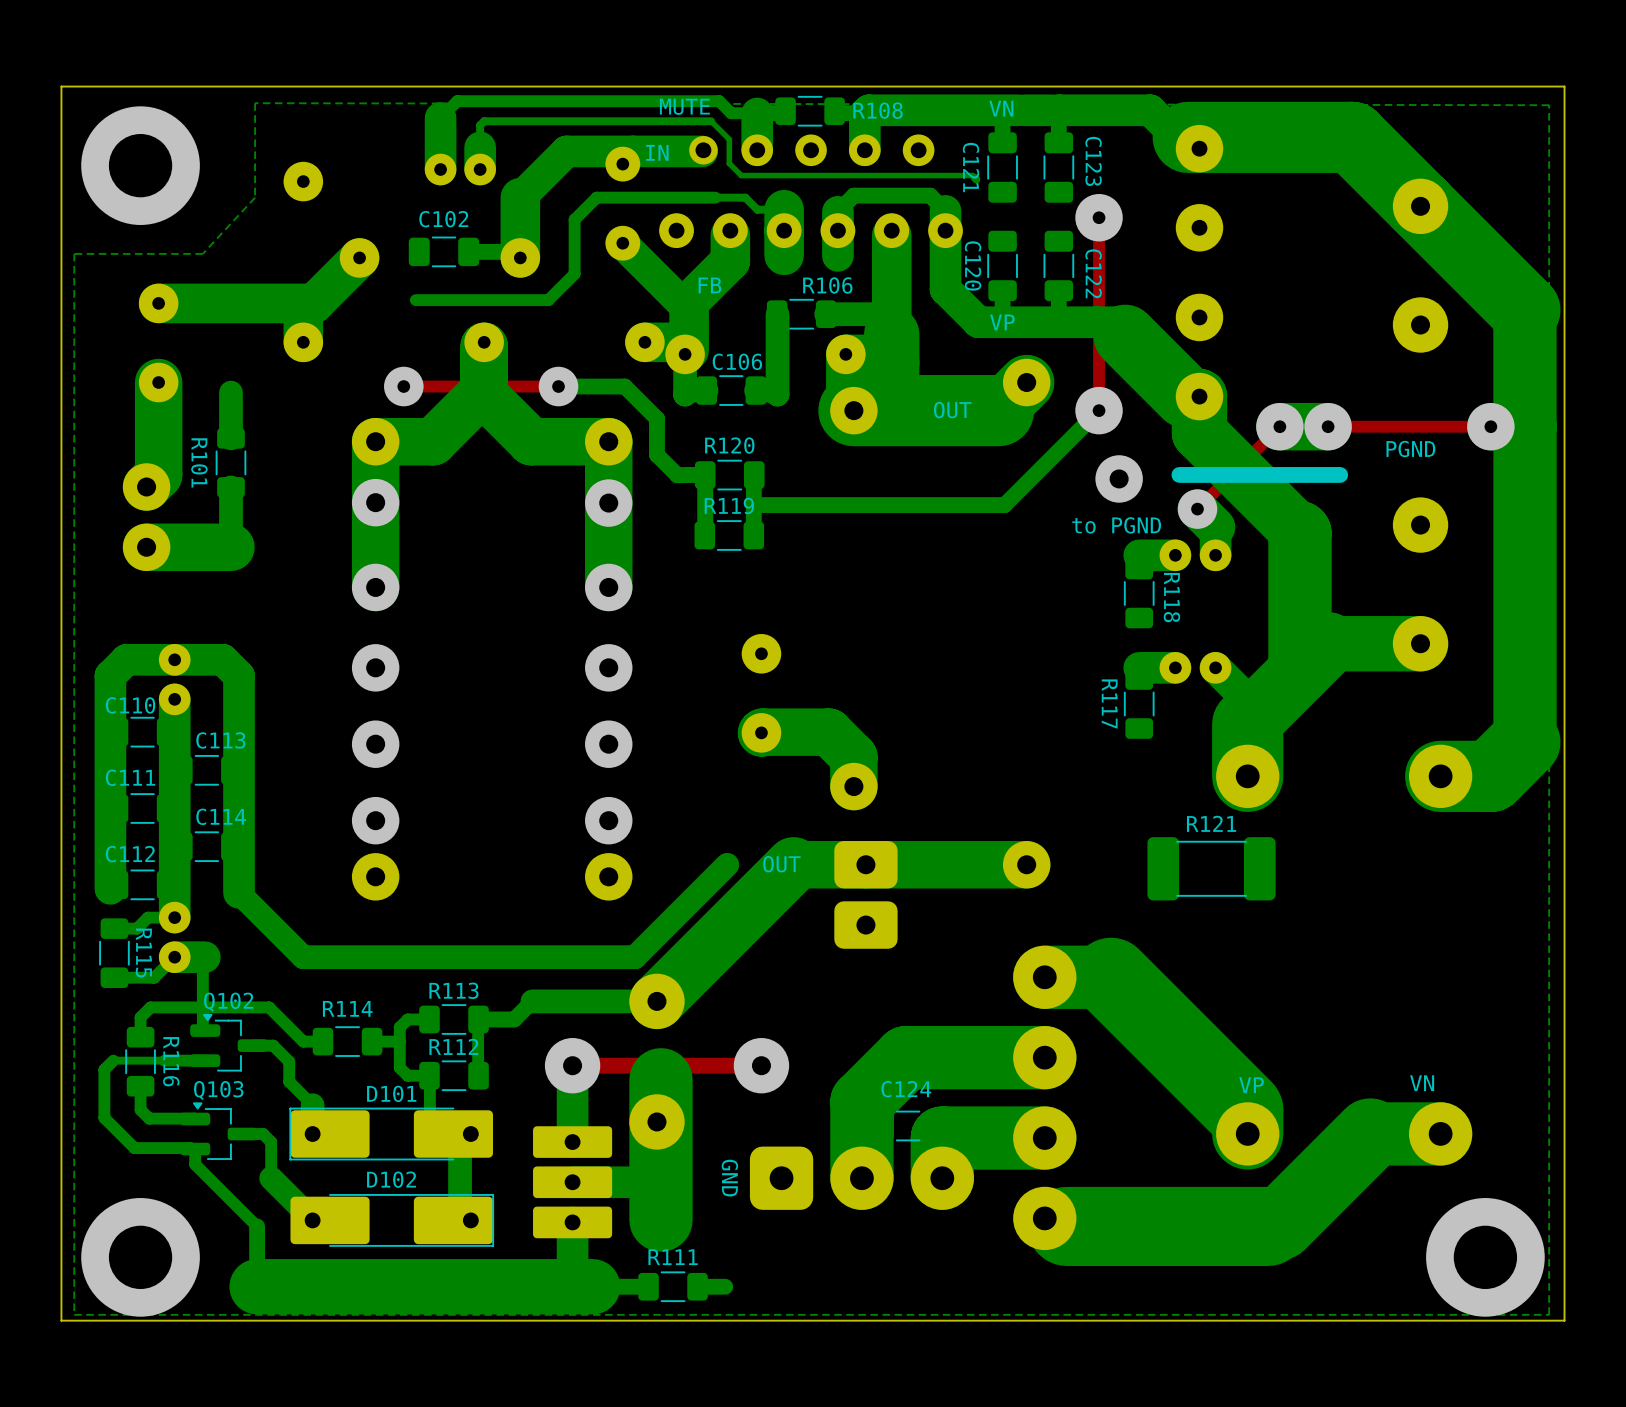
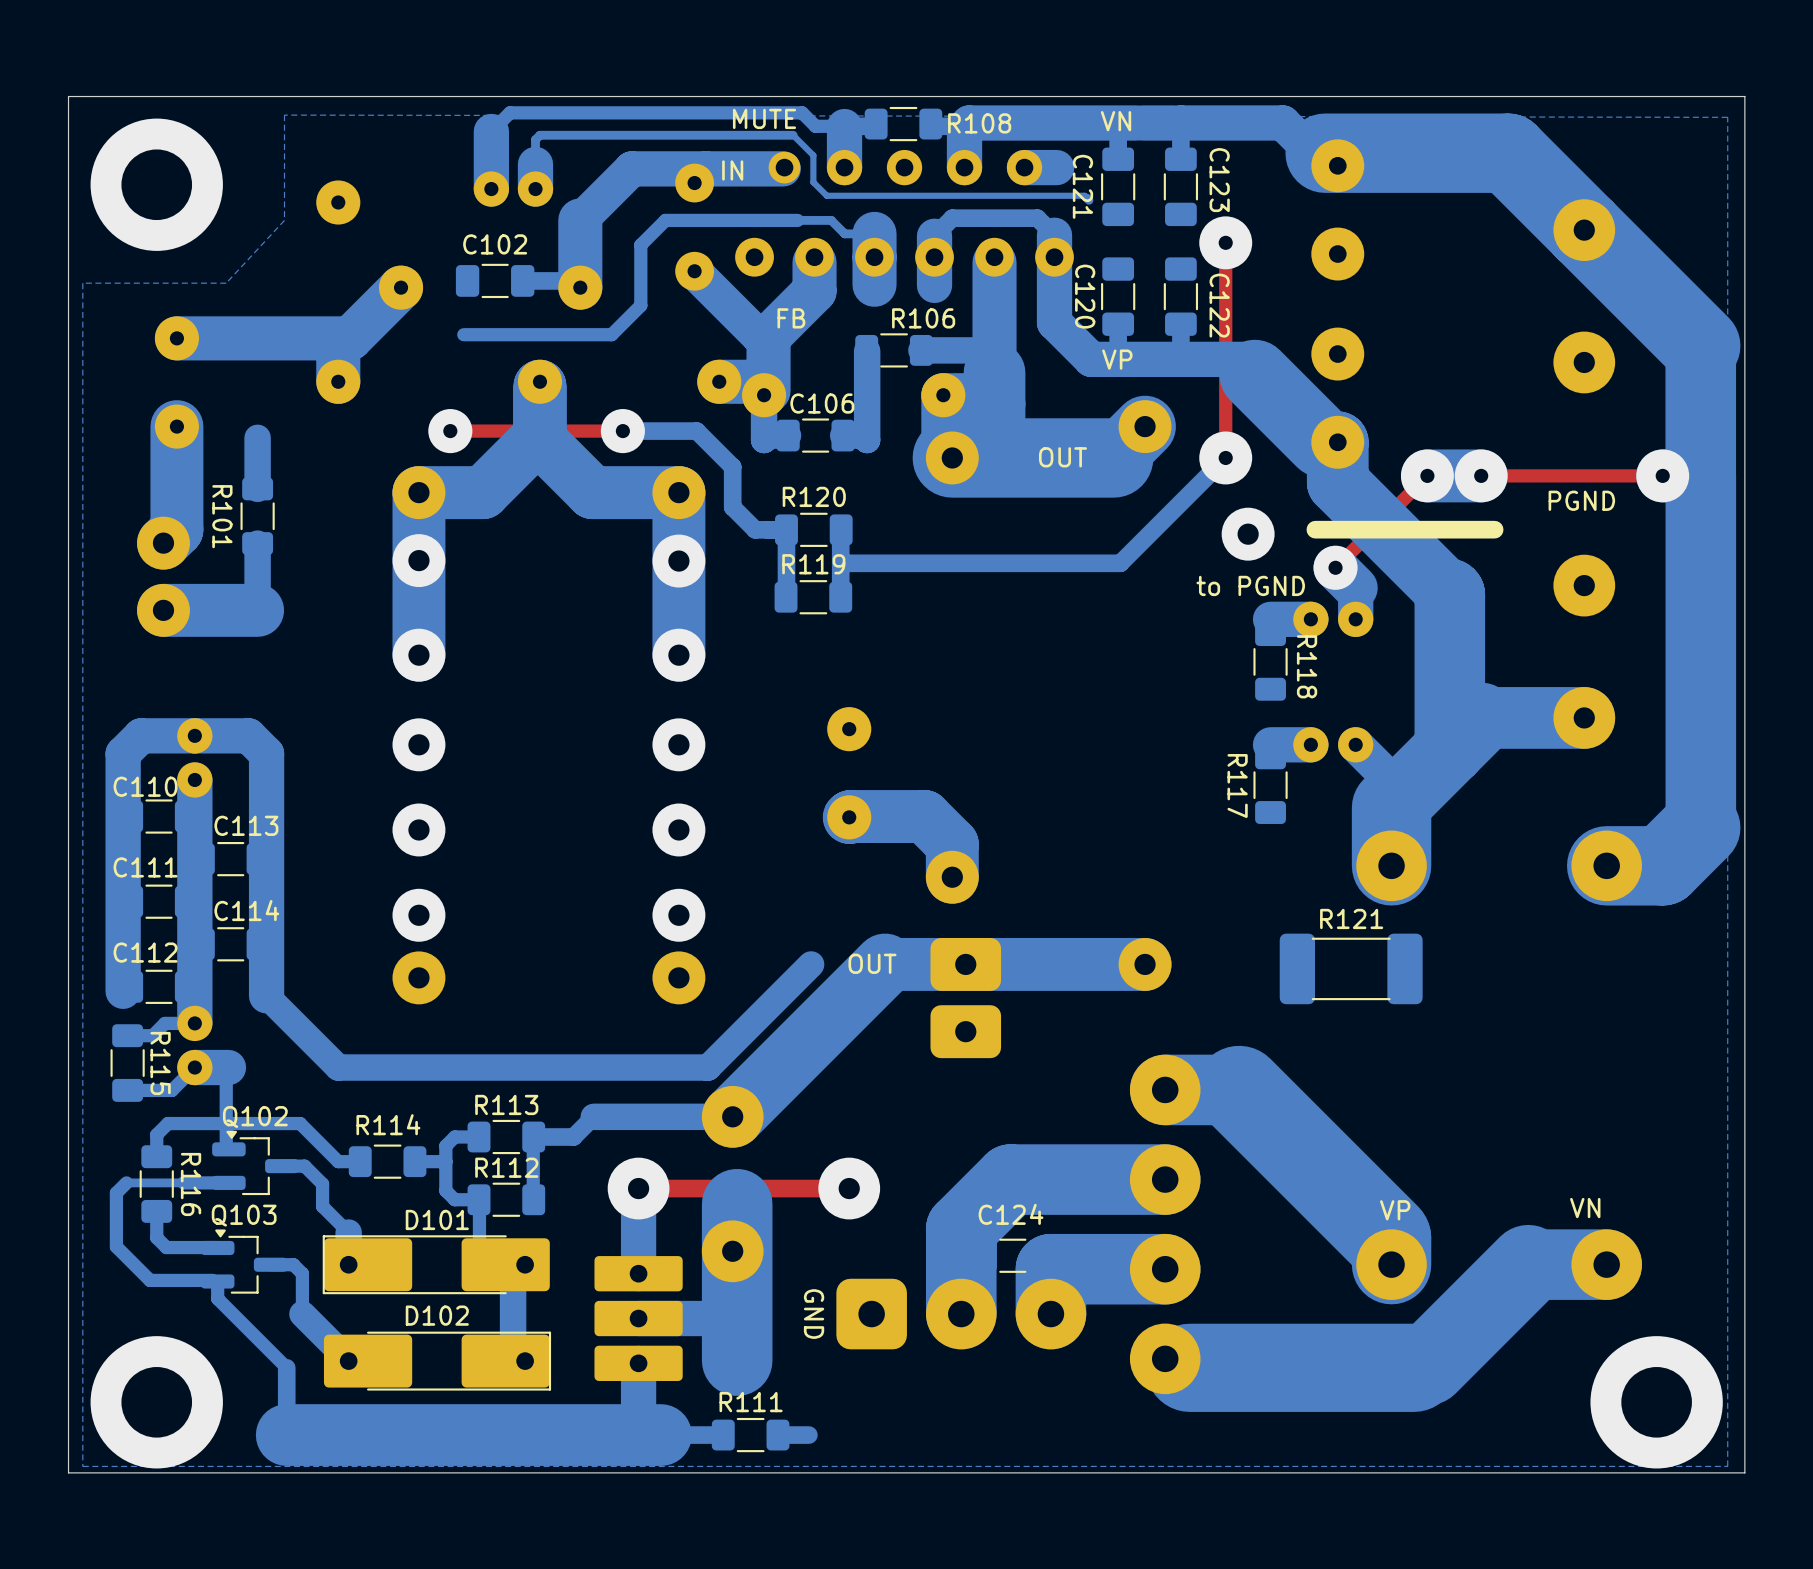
bottom track: none -> (1056, 167) (1024, 167)

